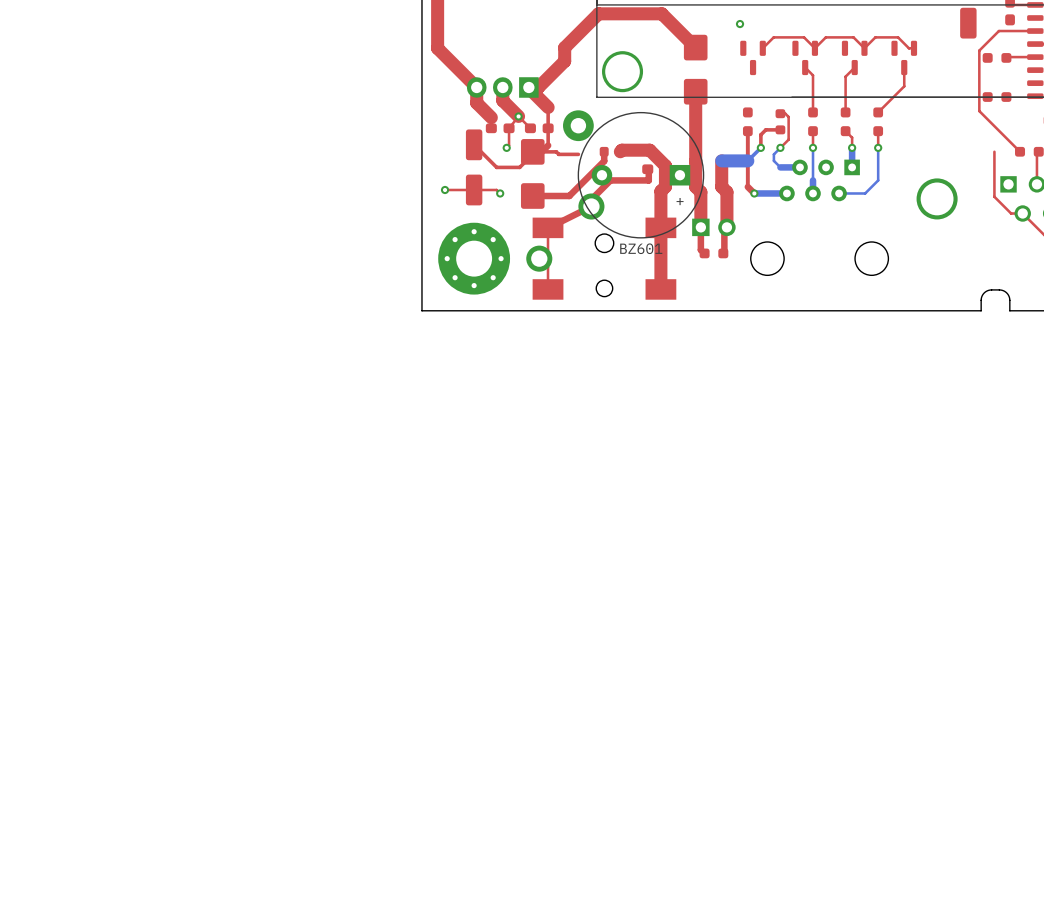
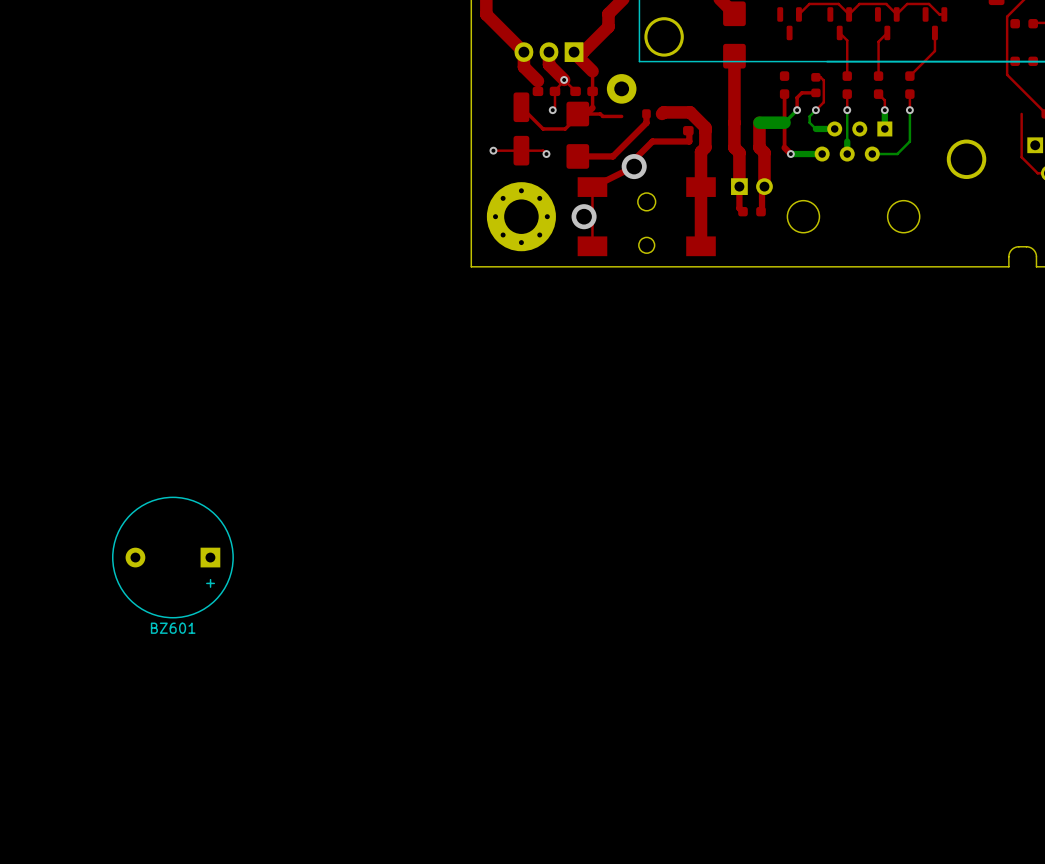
BZ601 position: (640, 175) -> (172, 557)

